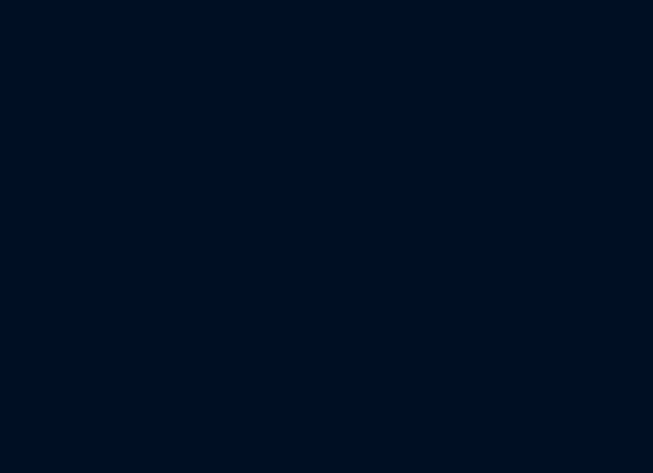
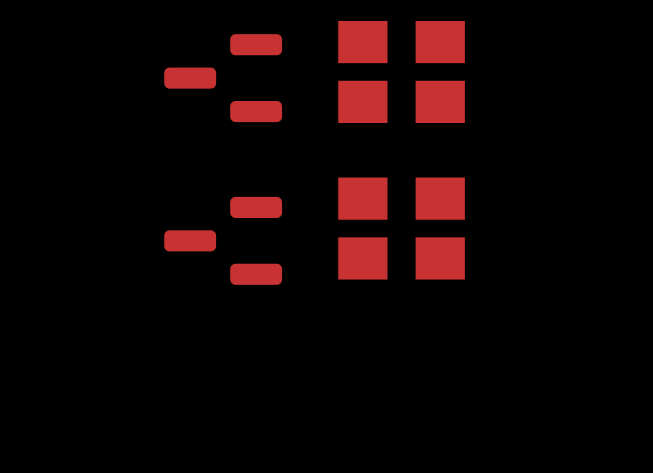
part: none -> (401, 71)
part: none -> (223, 78)
part: none -> (401, 228)
part: none -> (223, 240)

